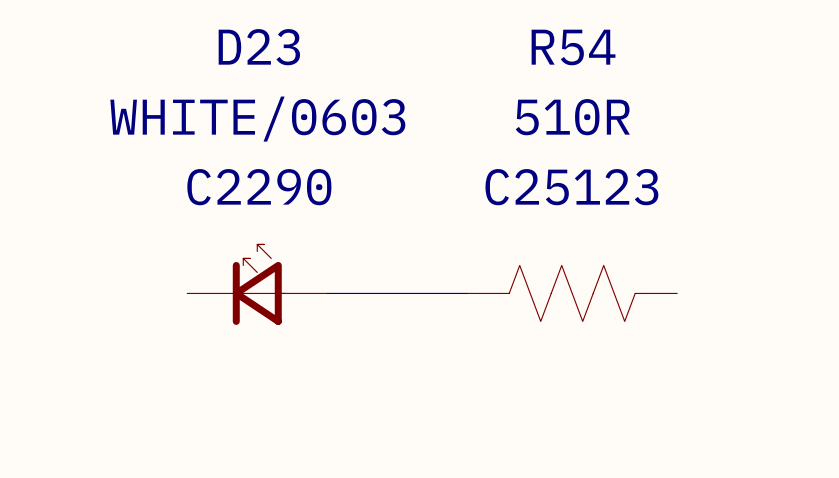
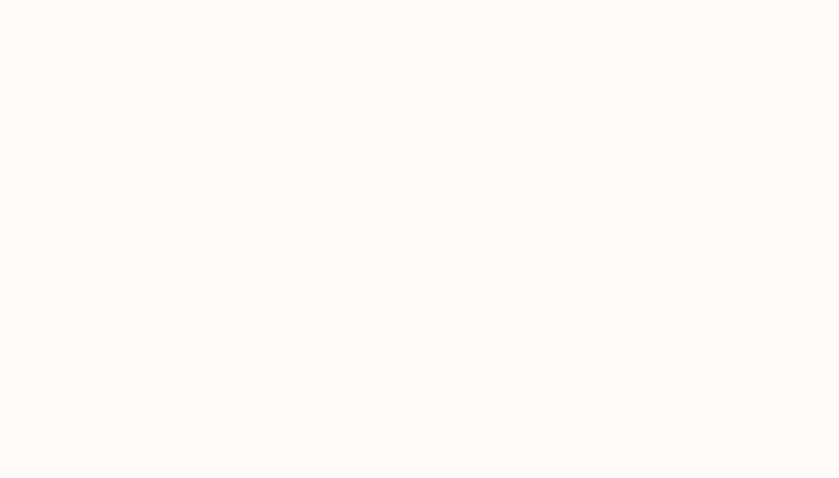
D23: WHITE/0603 (257, 284) -> none
wire: (327, 293) (467, 293) -> none
R54: 510R (572, 293) -> none

